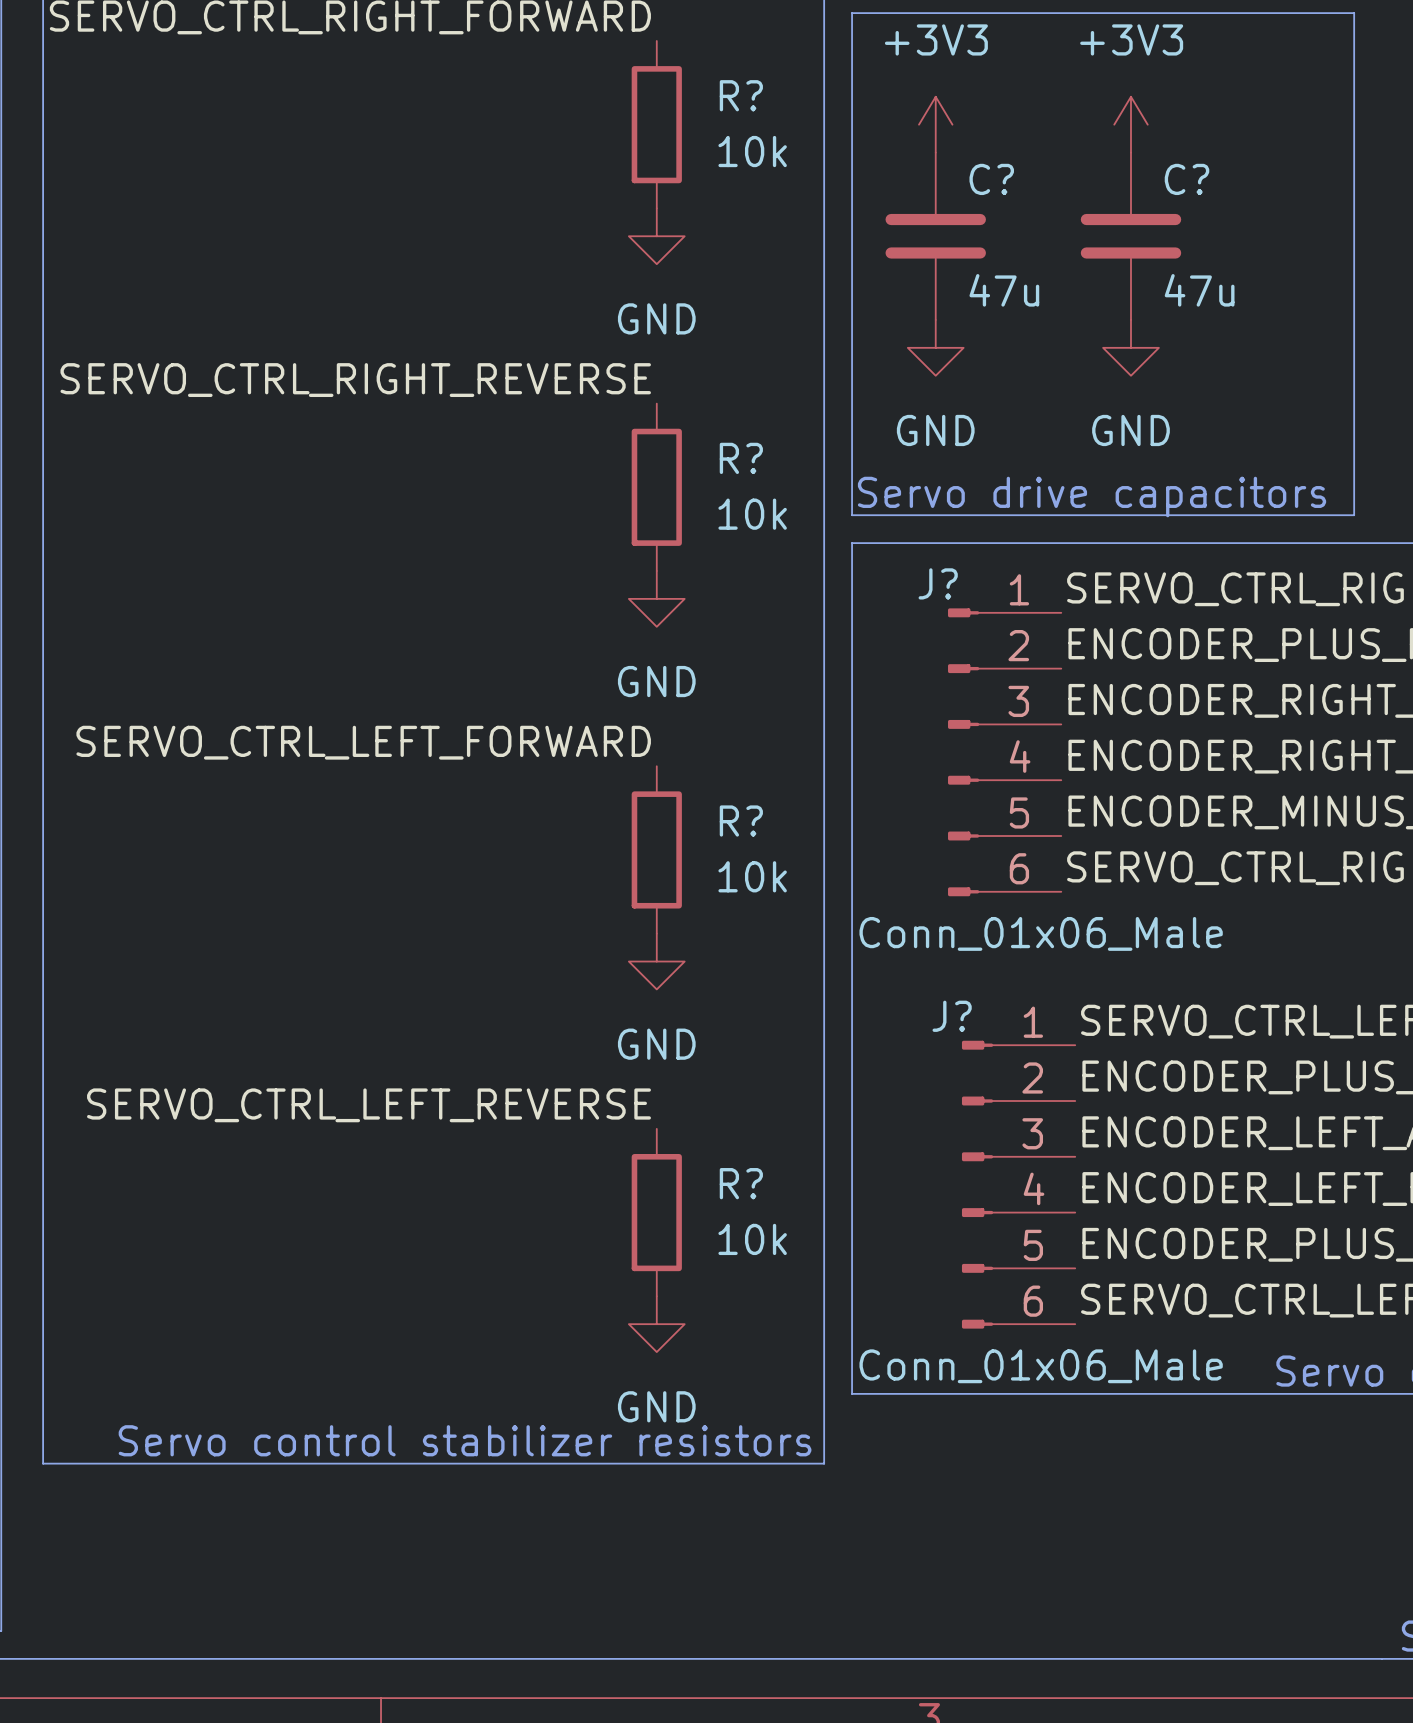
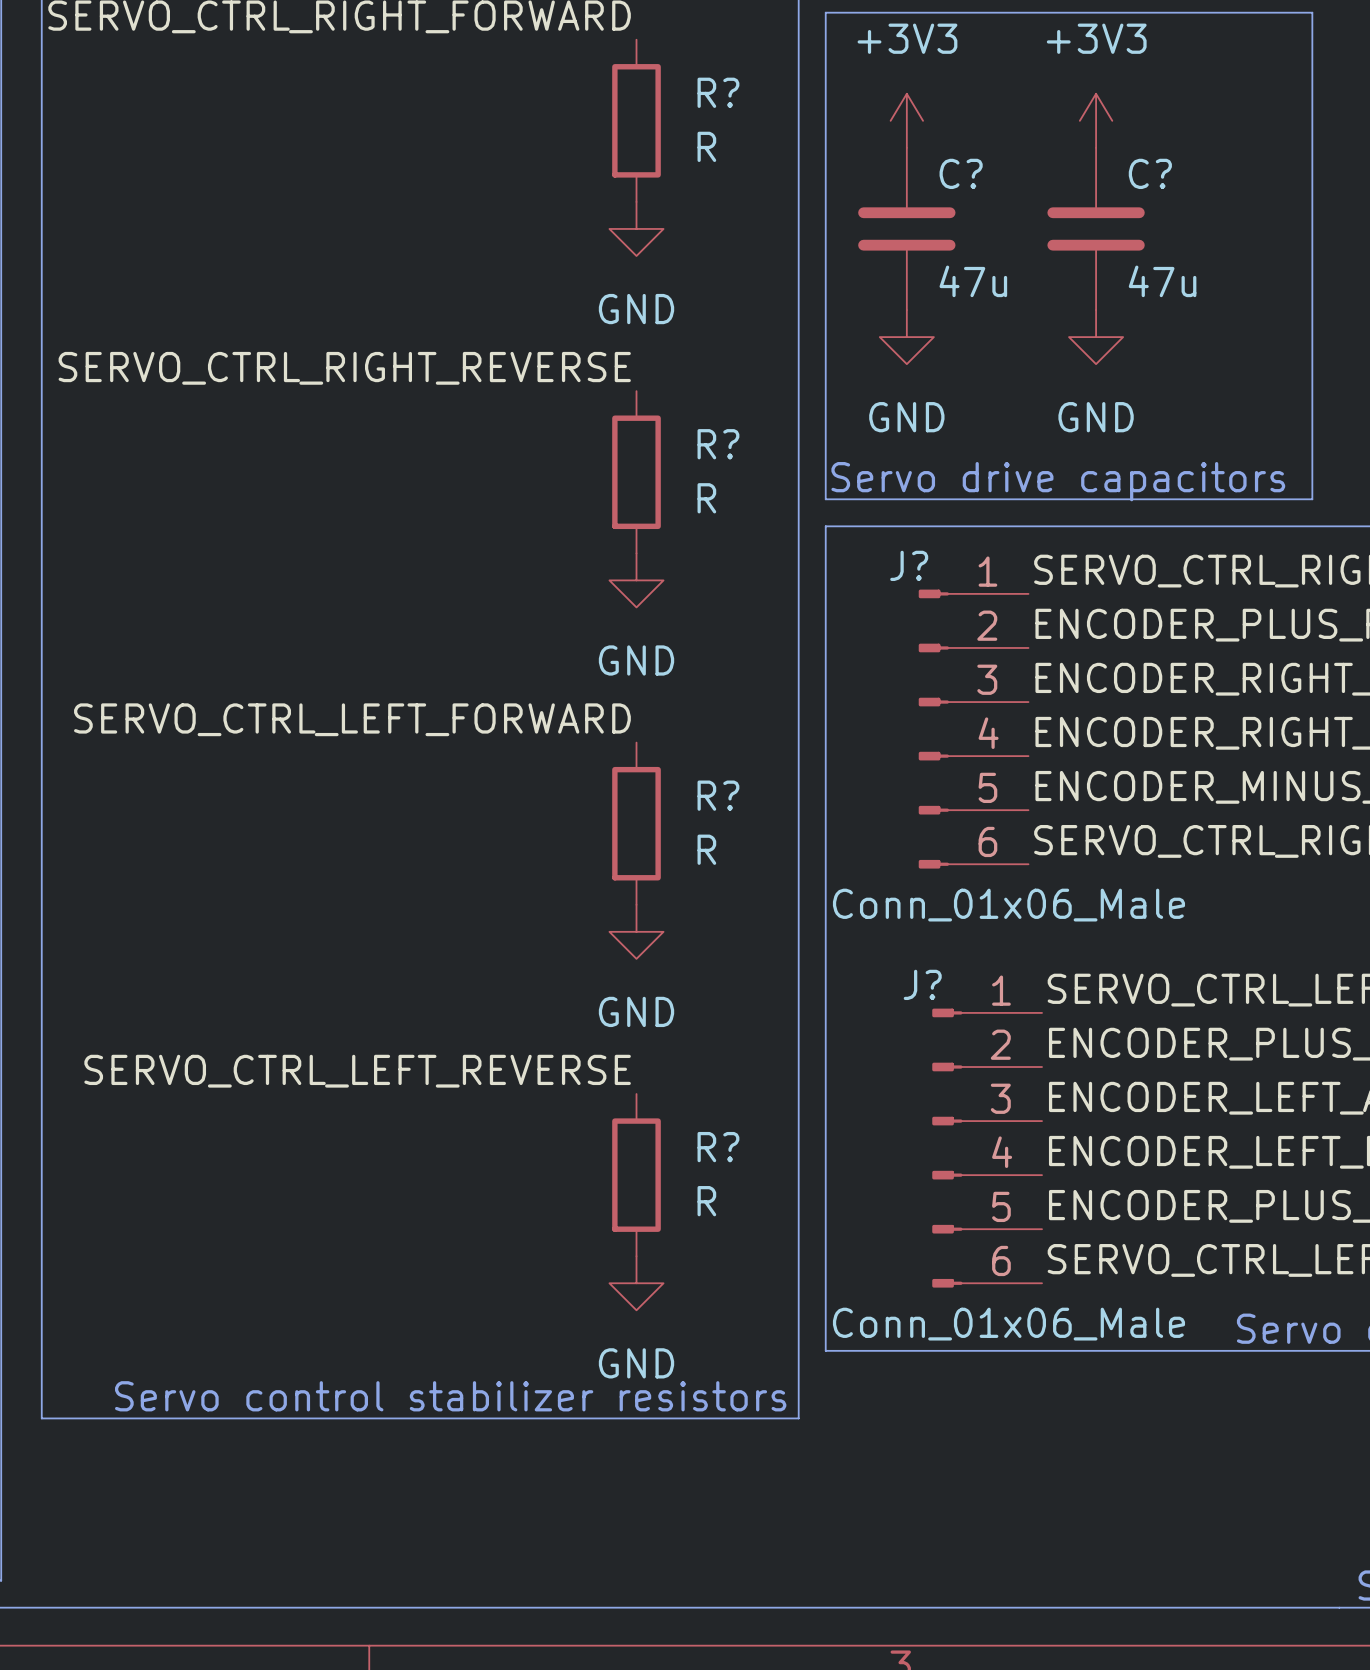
R? value: 10k (752, 151) -> R (706, 146)
R? value: 10k (752, 514) -> R (706, 498)
R? value: 10k (752, 876) -> R (706, 849)
R? value: 10k (752, 1239) -> R (706, 1201)

